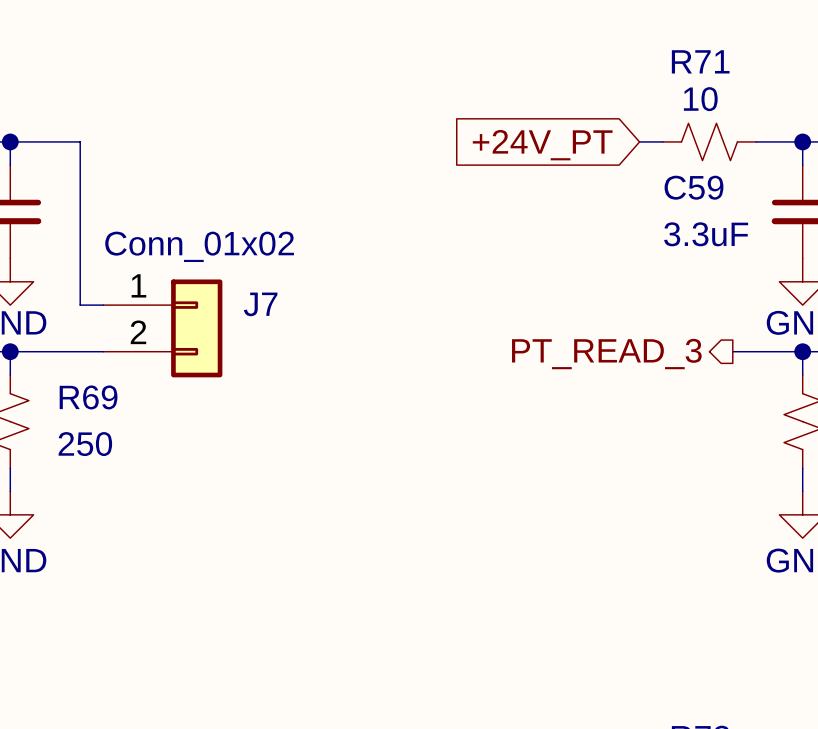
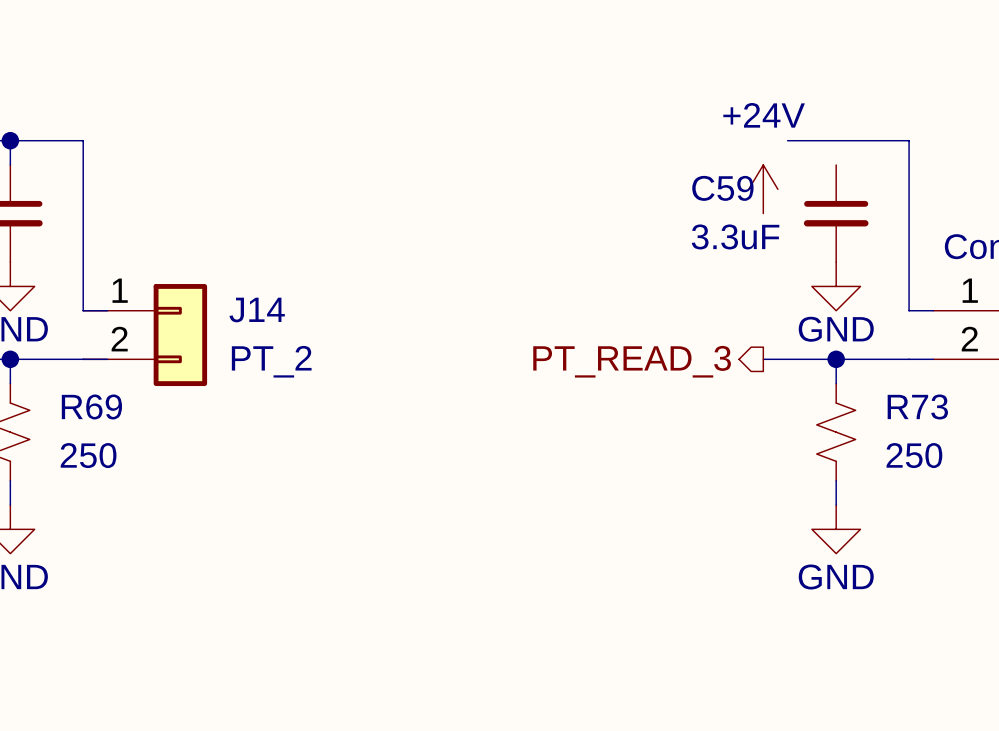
wire: (639, 141) (662, 141) -> none
R71: 10 (709, 141) -> none
wire: (802, 141) (802, 165) -> none
junction: (802, 141) -> none
global label: +24V_PT (542, 145) -> none
power symbol: none -> +24V (763, 189)
J14: none -> PT_2 (145, 335)
J7: Conn_01x02 (162, 328) -> none

